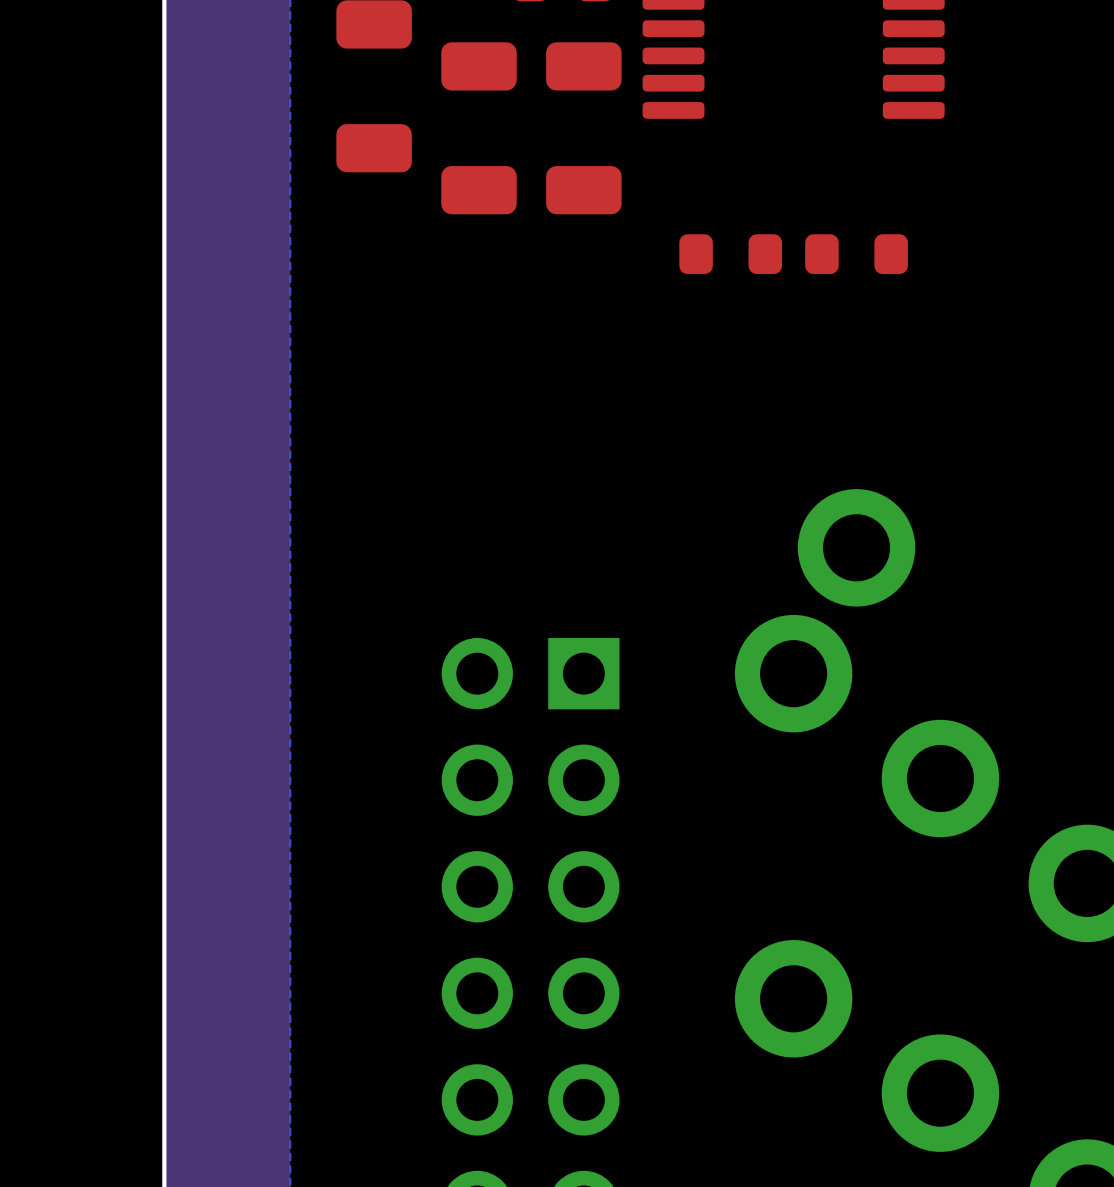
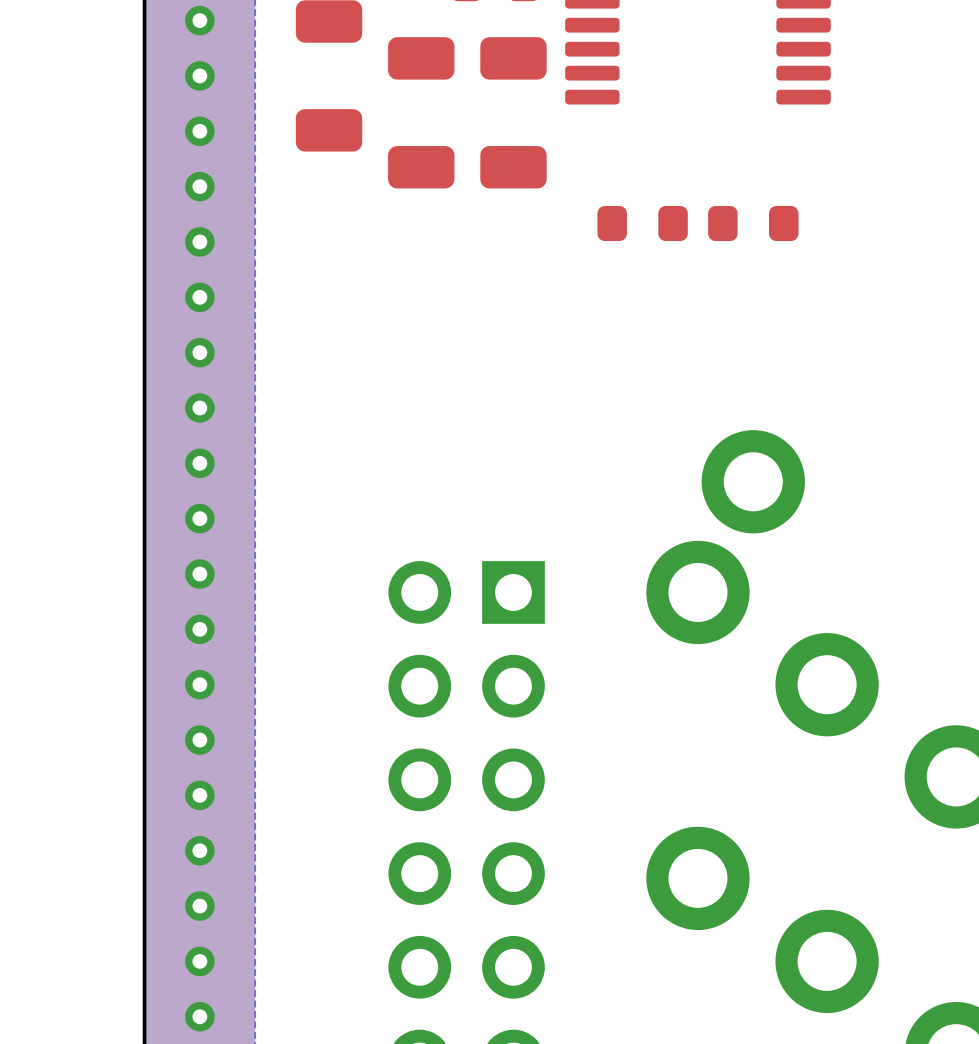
via: none -> (199, 20)
via: none -> (199, 75)
via: none -> (199, 131)
via: none -> (199, 186)
via: none -> (199, 241)
via: none -> (199, 297)
via: none -> (199, 352)
via: none -> (199, 407)
via: none -> (199, 463)
via: none -> (199, 518)
via: none -> (199, 574)
via: none -> (199, 629)
via: none -> (199, 684)
via: none -> (199, 740)
via: none -> (199, 795)
via: none -> (199, 850)
via: none -> (199, 906)
via: none -> (199, 961)
via: none -> (199, 1016)

